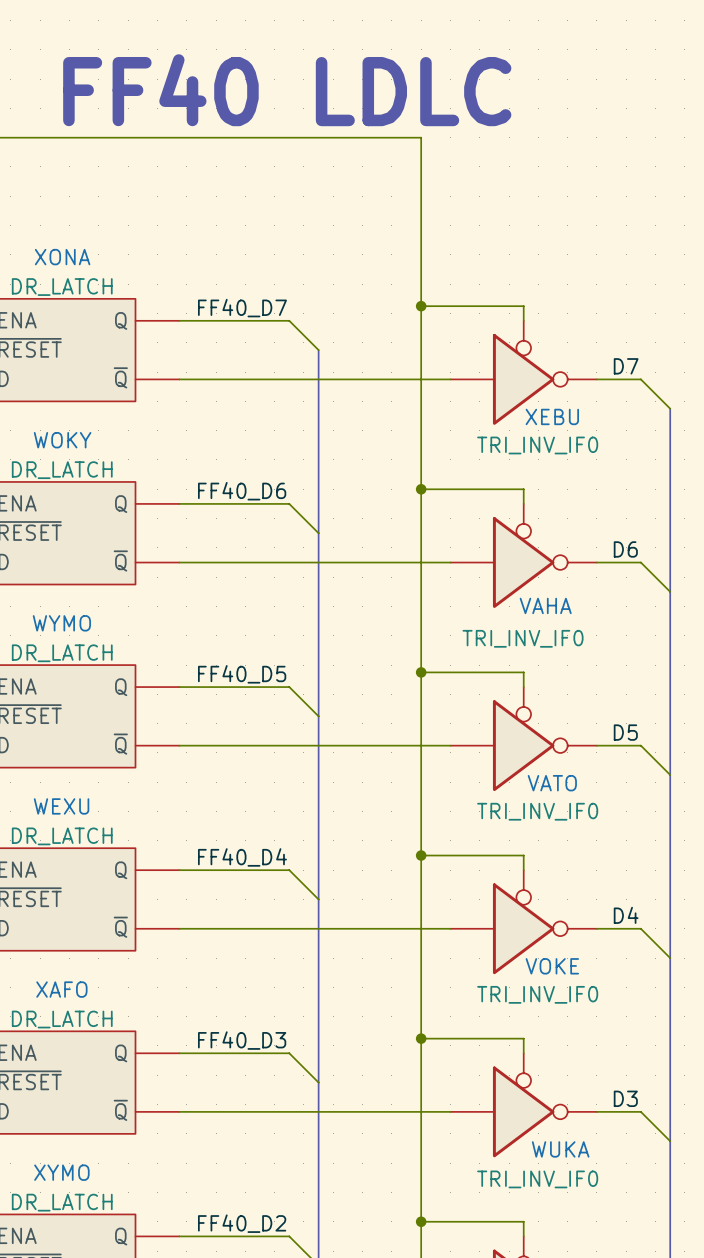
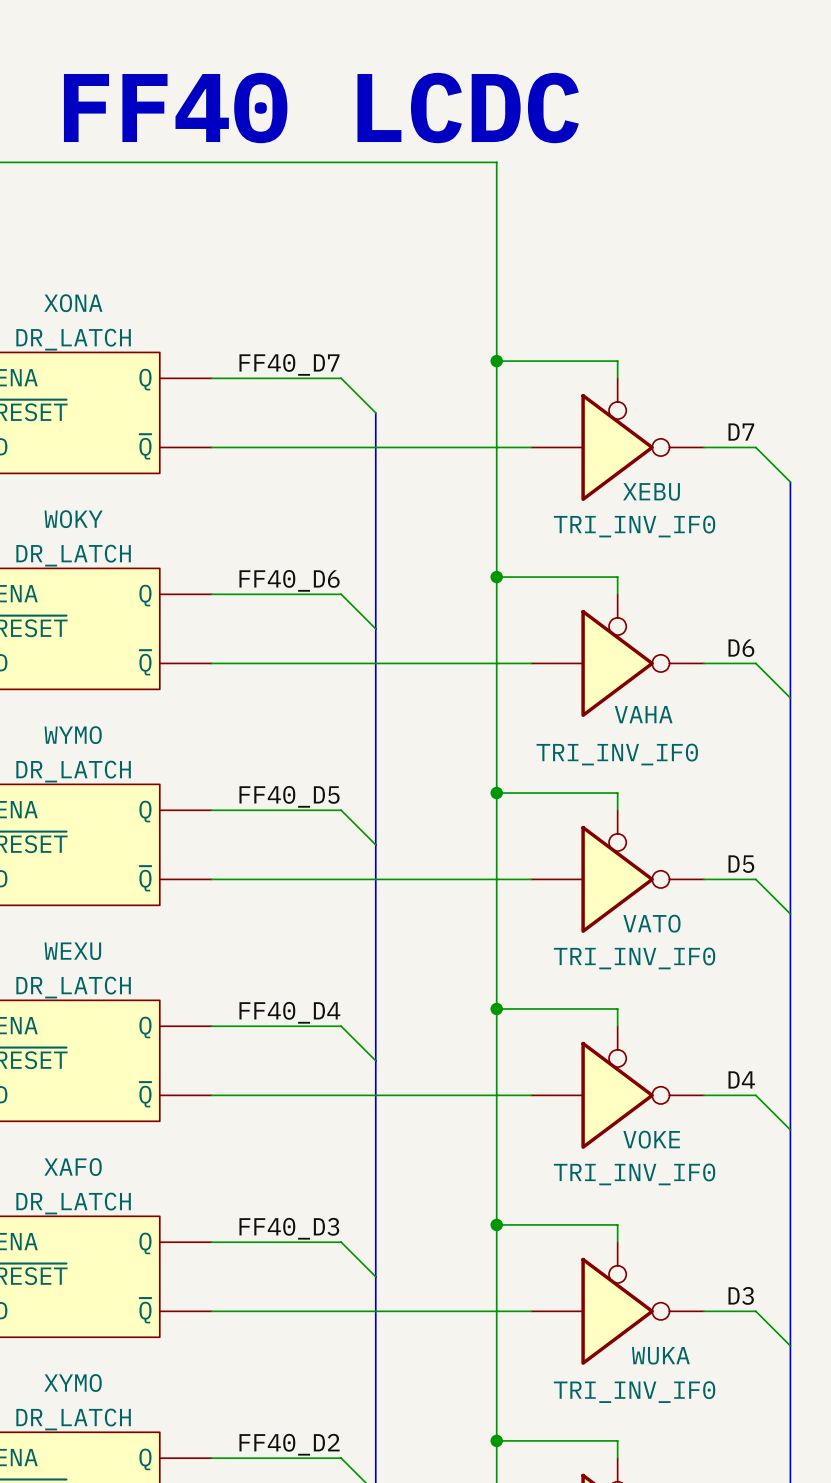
text: FF40 LDLC (287, 90) -> FF40 LCDC (321, 108)

